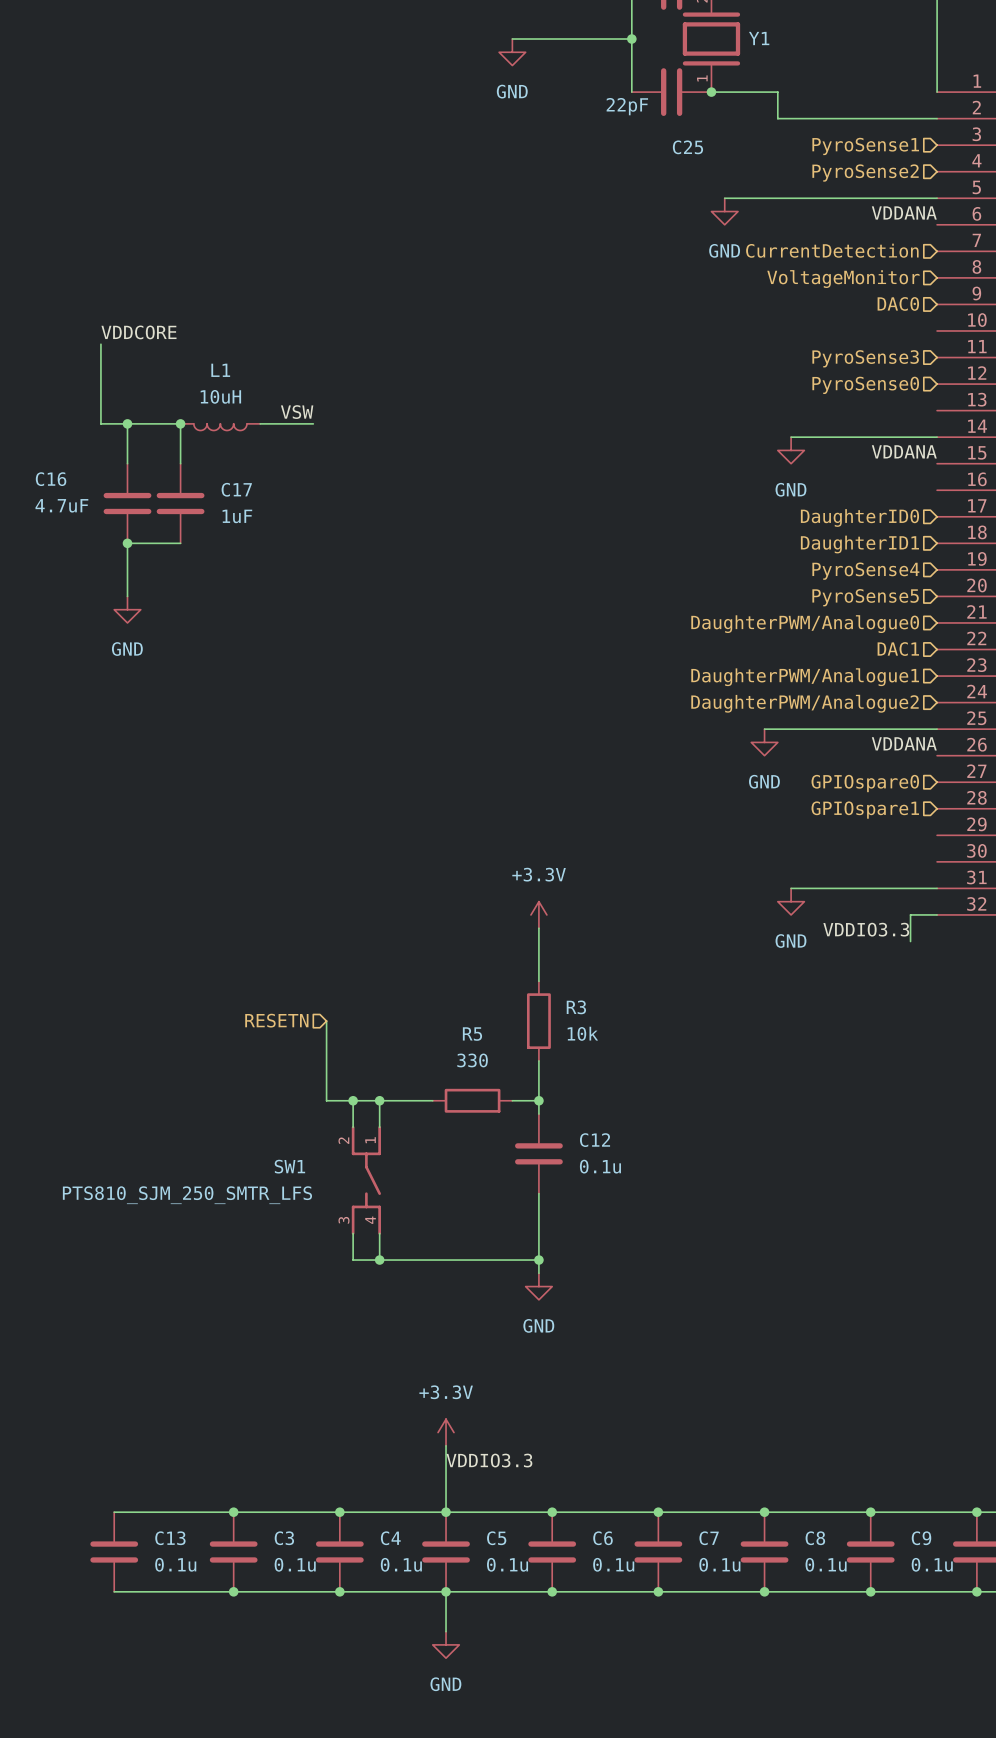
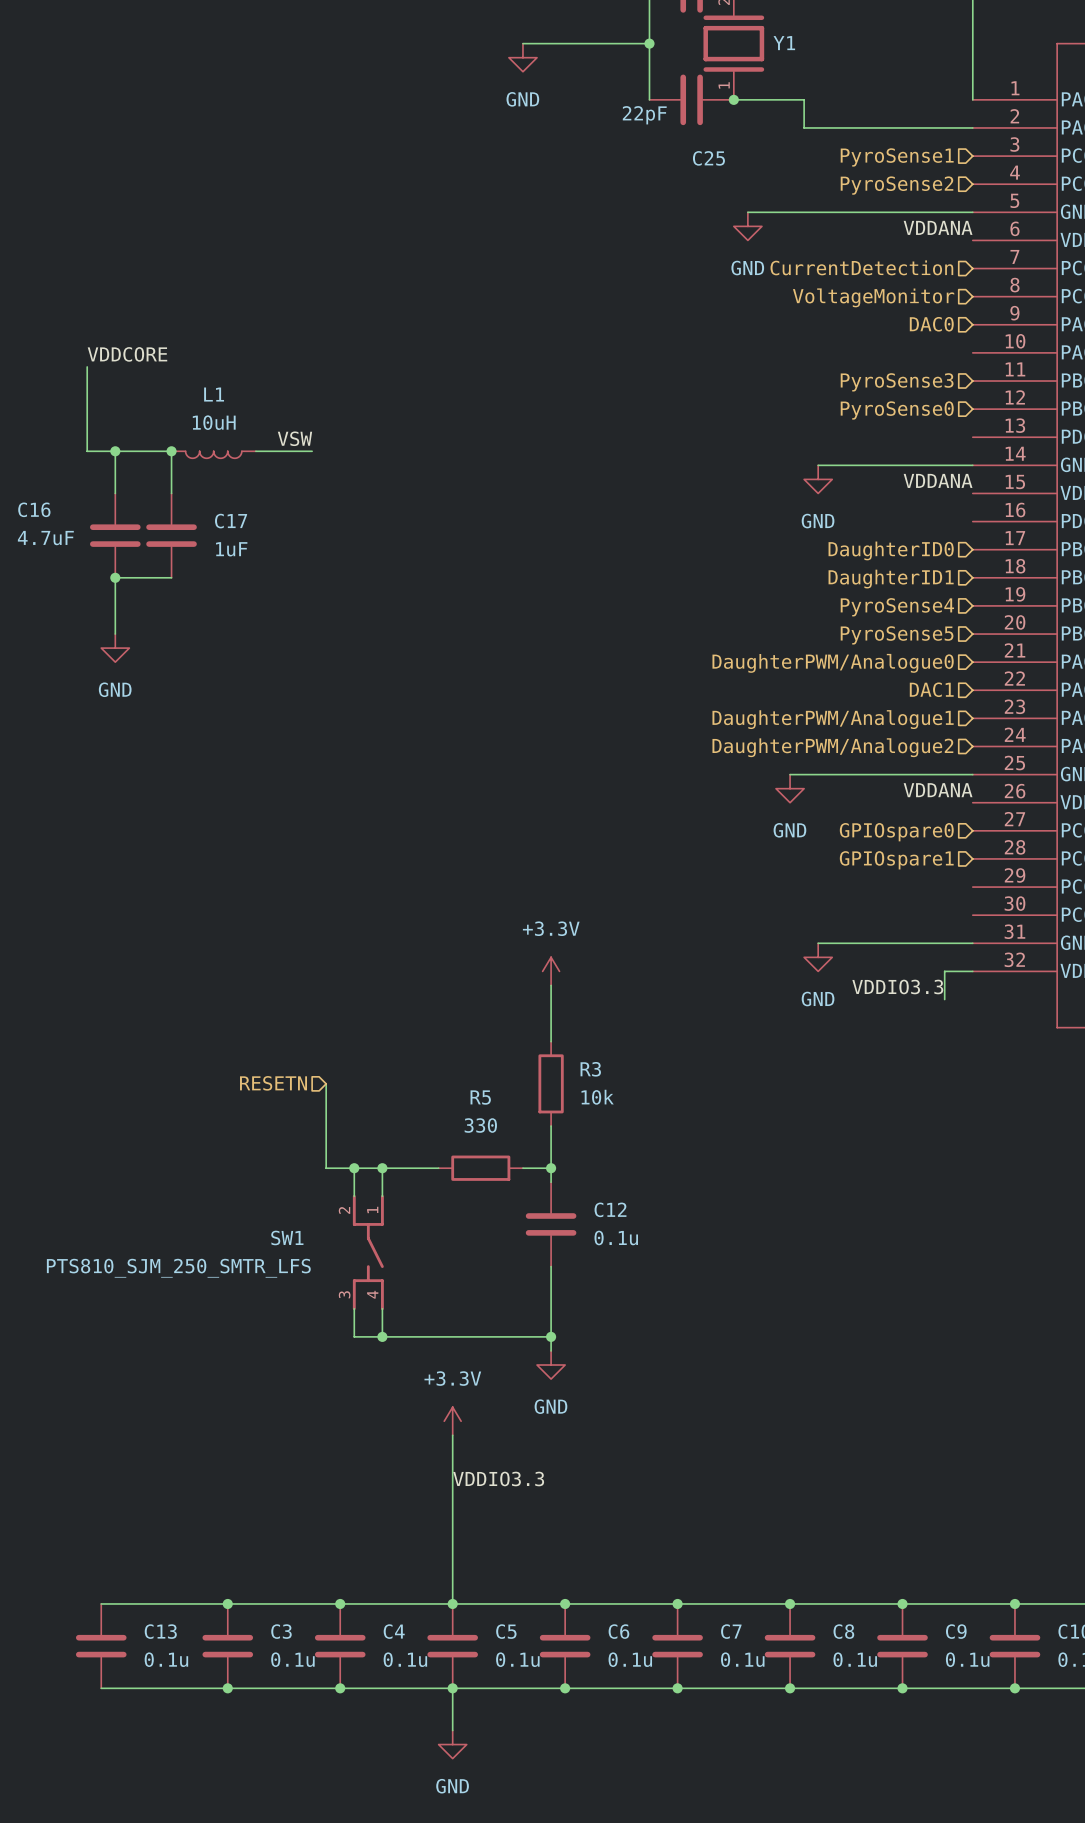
wire: none -> (452, 1435) (452, 1533)
power symbol position: +3.3V (446, 1432) -> +3.3V (452, 1421)
label position: VDDIO3.3 (489, 1460) -> VDDIO3.3 (498, 1478)

